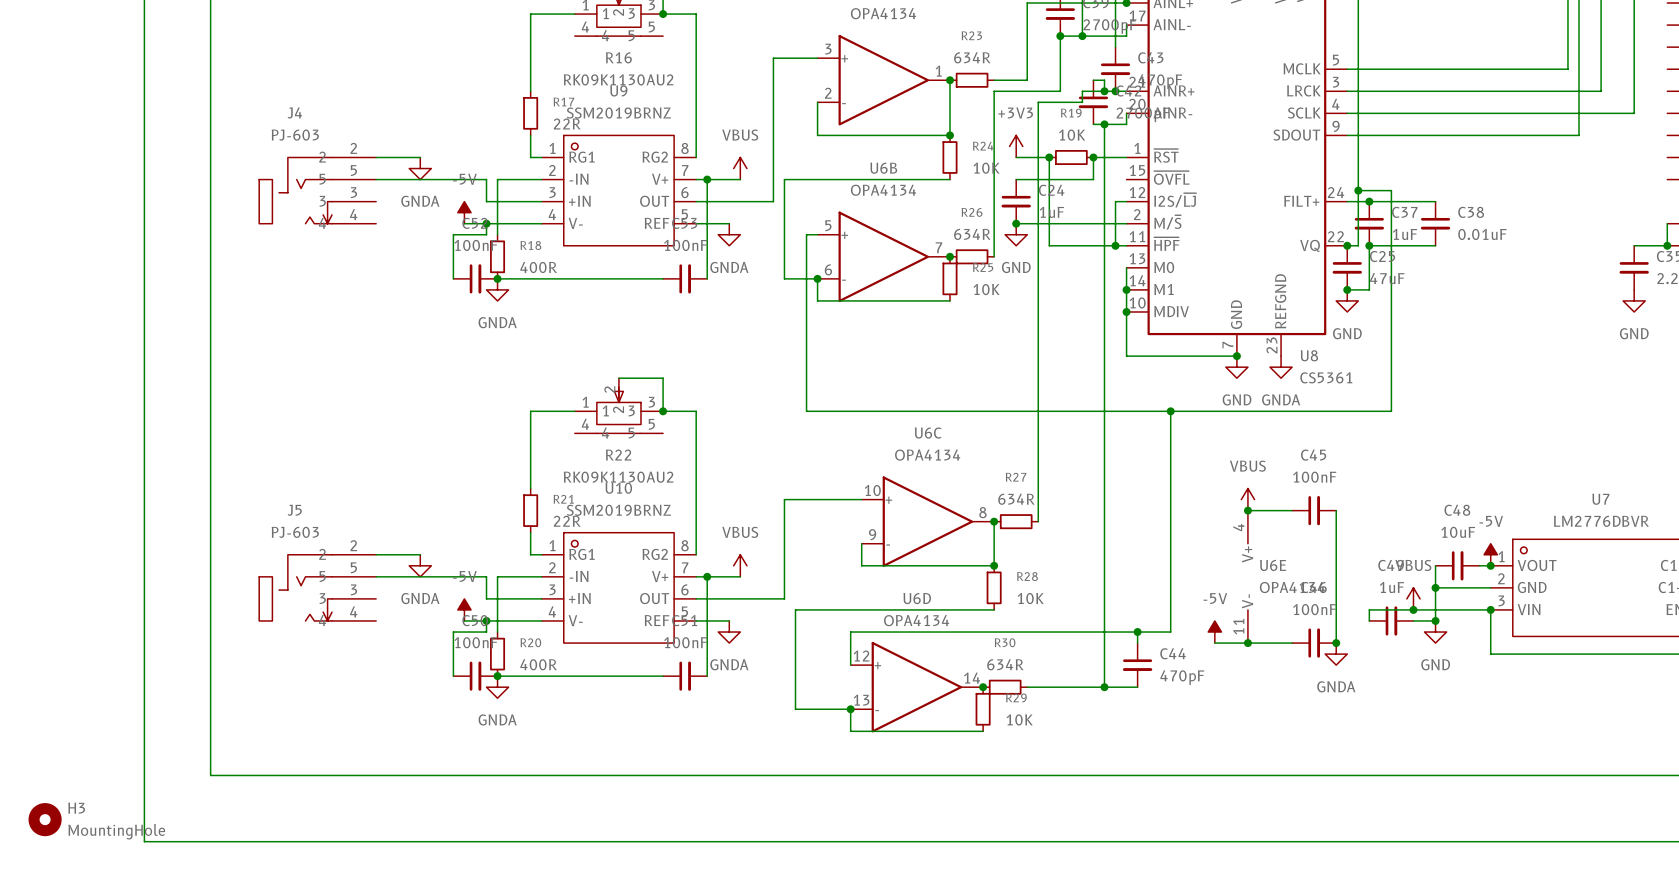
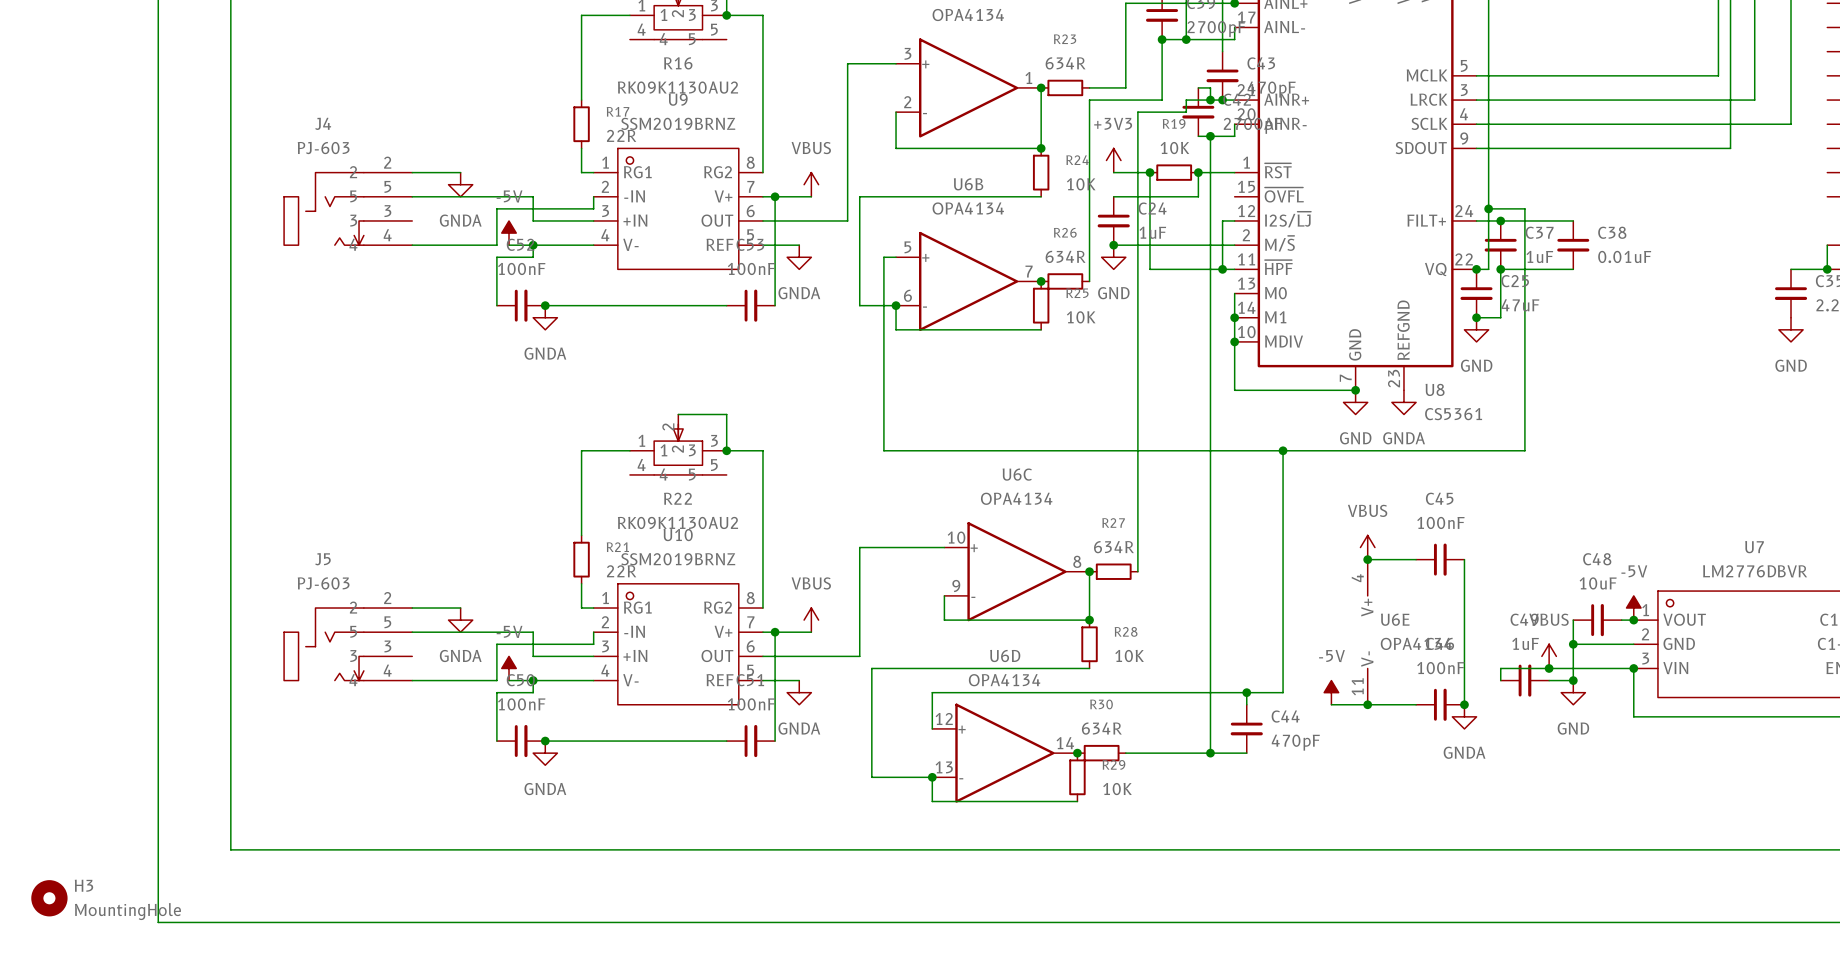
wire: (541, 179) (497, 179) (497, 234) -> (593, 196) (593, 208) (496, 208) (496, 245) (412, 245)
R18: 400R (497, 256) -> none
wire: (541, 576) (497, 576) (497, 632) -> (593, 632) (593, 644) (496, 644) (496, 680) (412, 680)
R20: 400R (497, 654) -> none

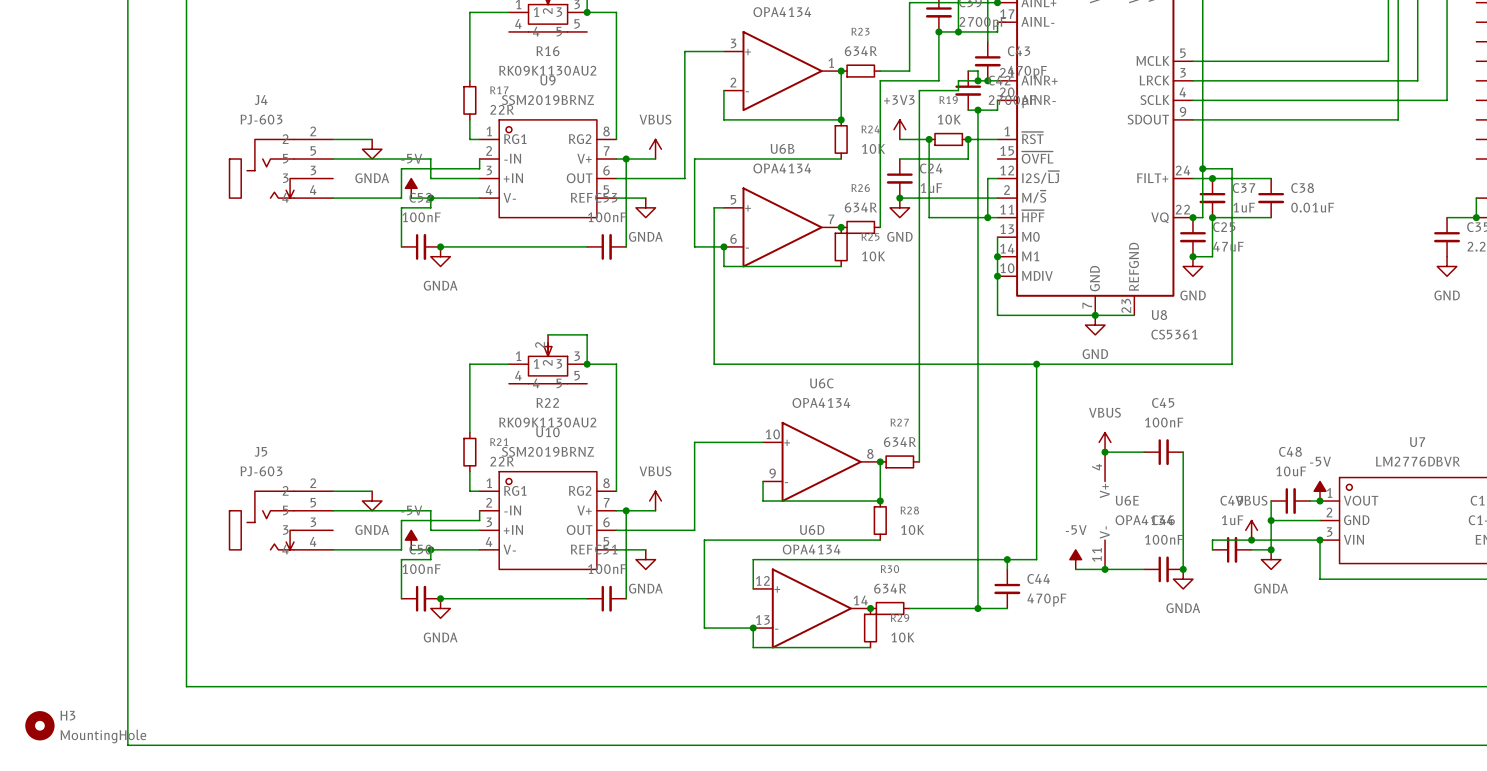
wire: none -> (1095, 315) (1134, 315)
power symbol: GNDA (1403, 402) -> none
power symbol: GND (1573, 692) -> GNDA (1271, 559)

